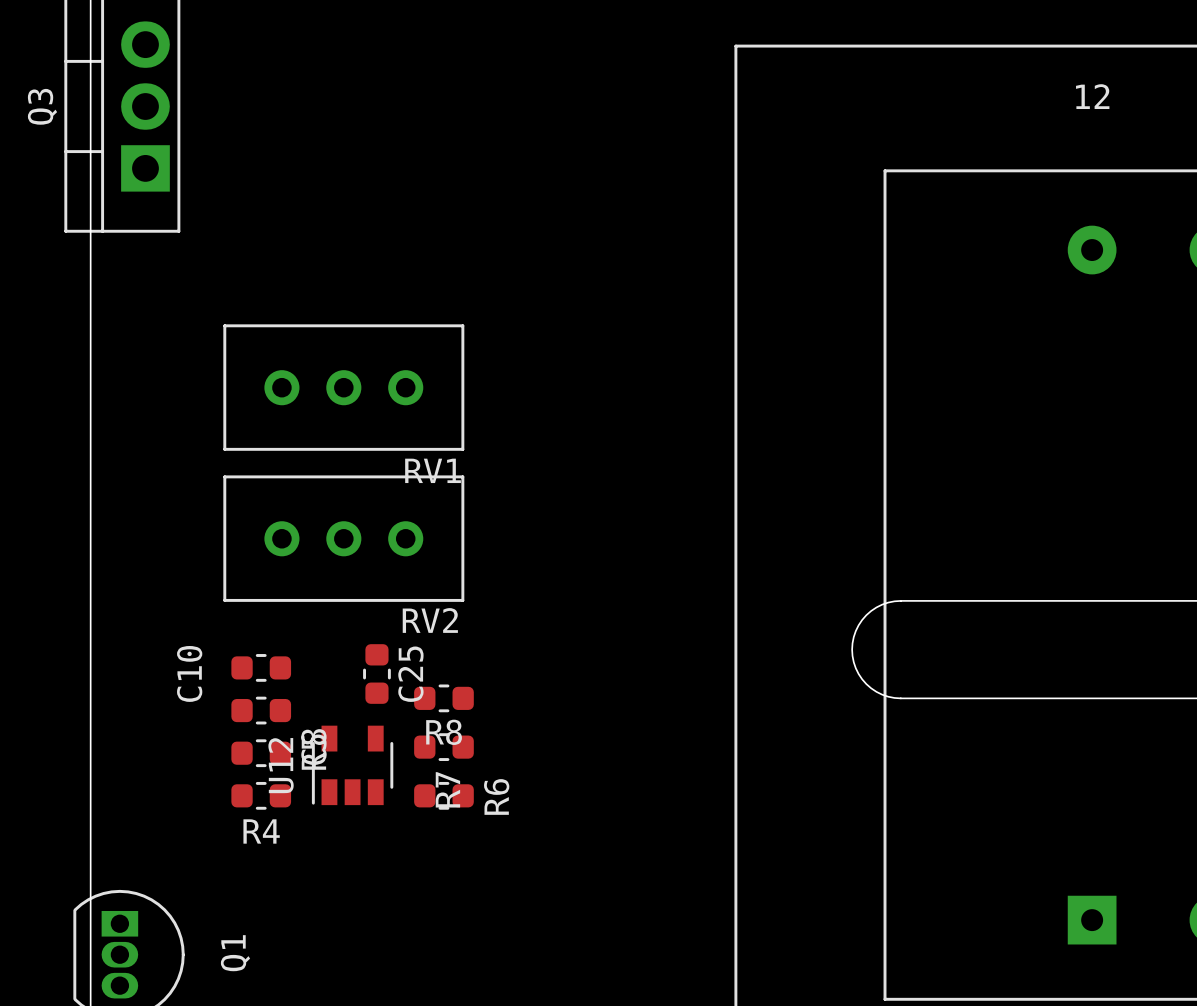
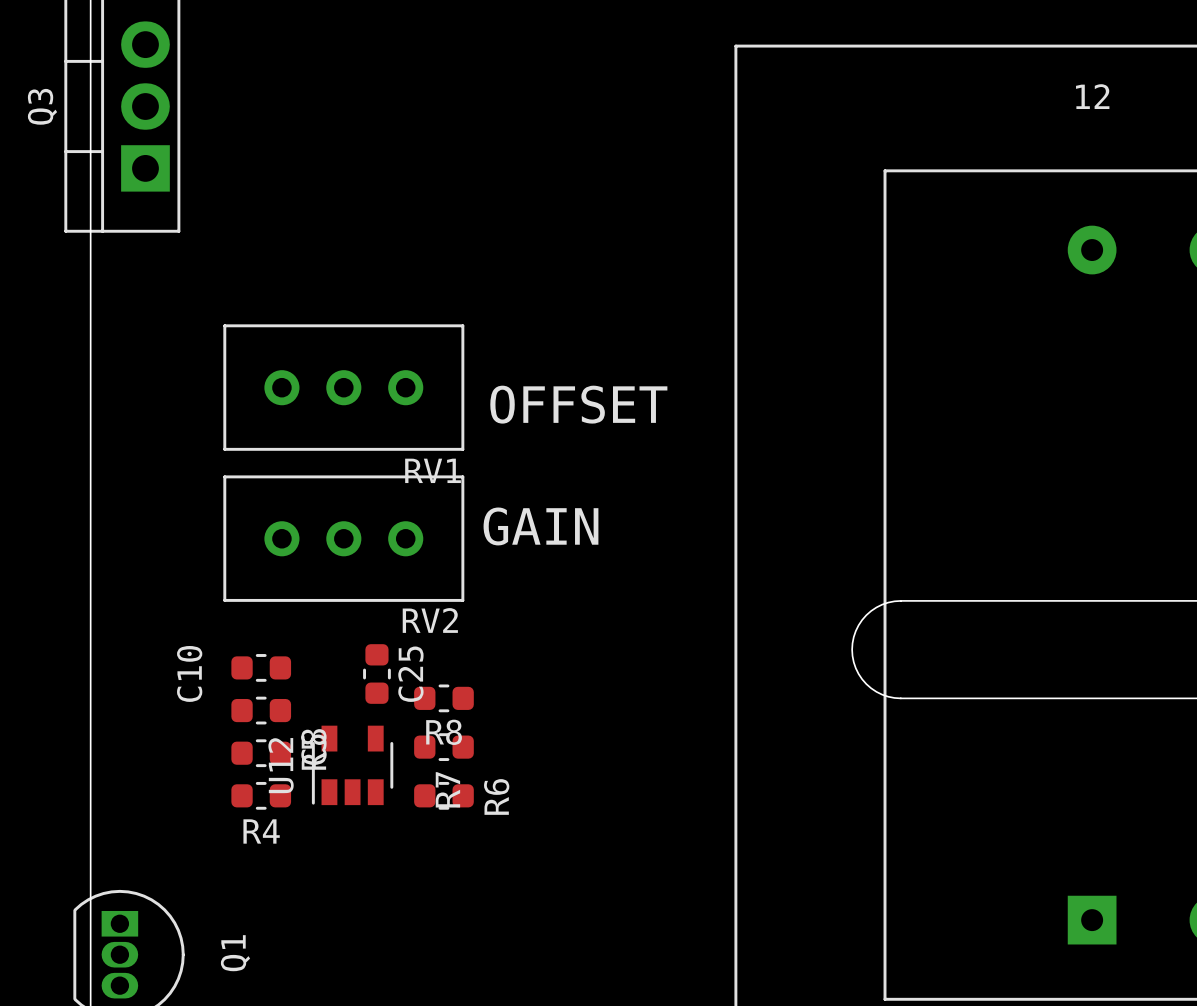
text: none -> OFFSET (578, 404)
text: none -> GAIN (540, 526)

